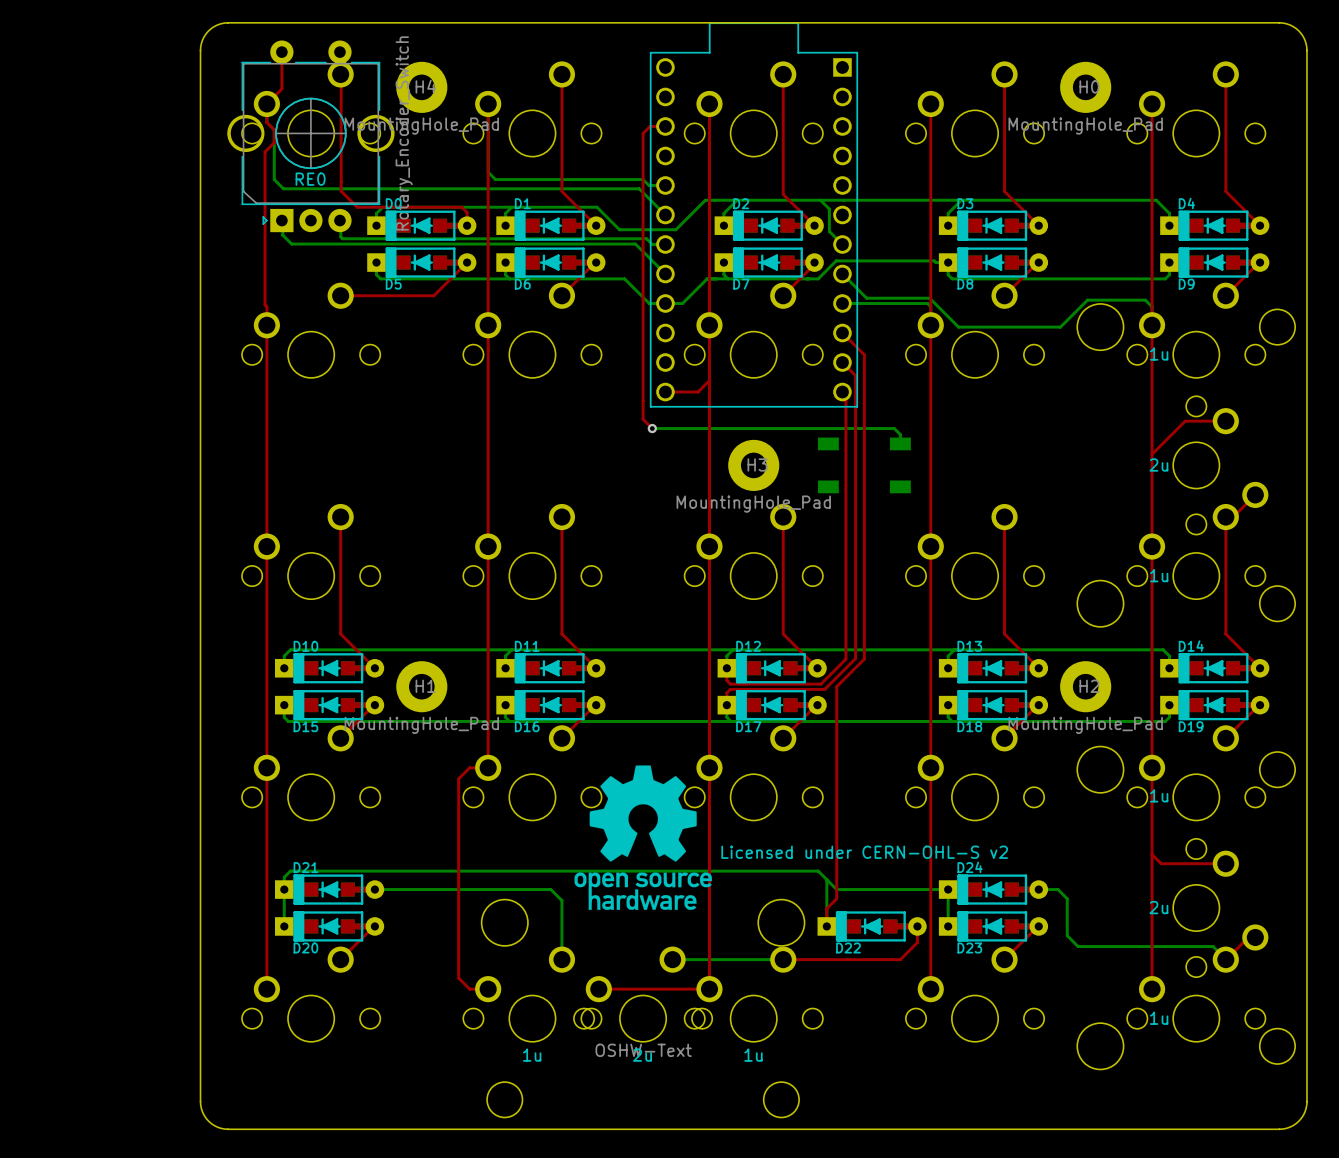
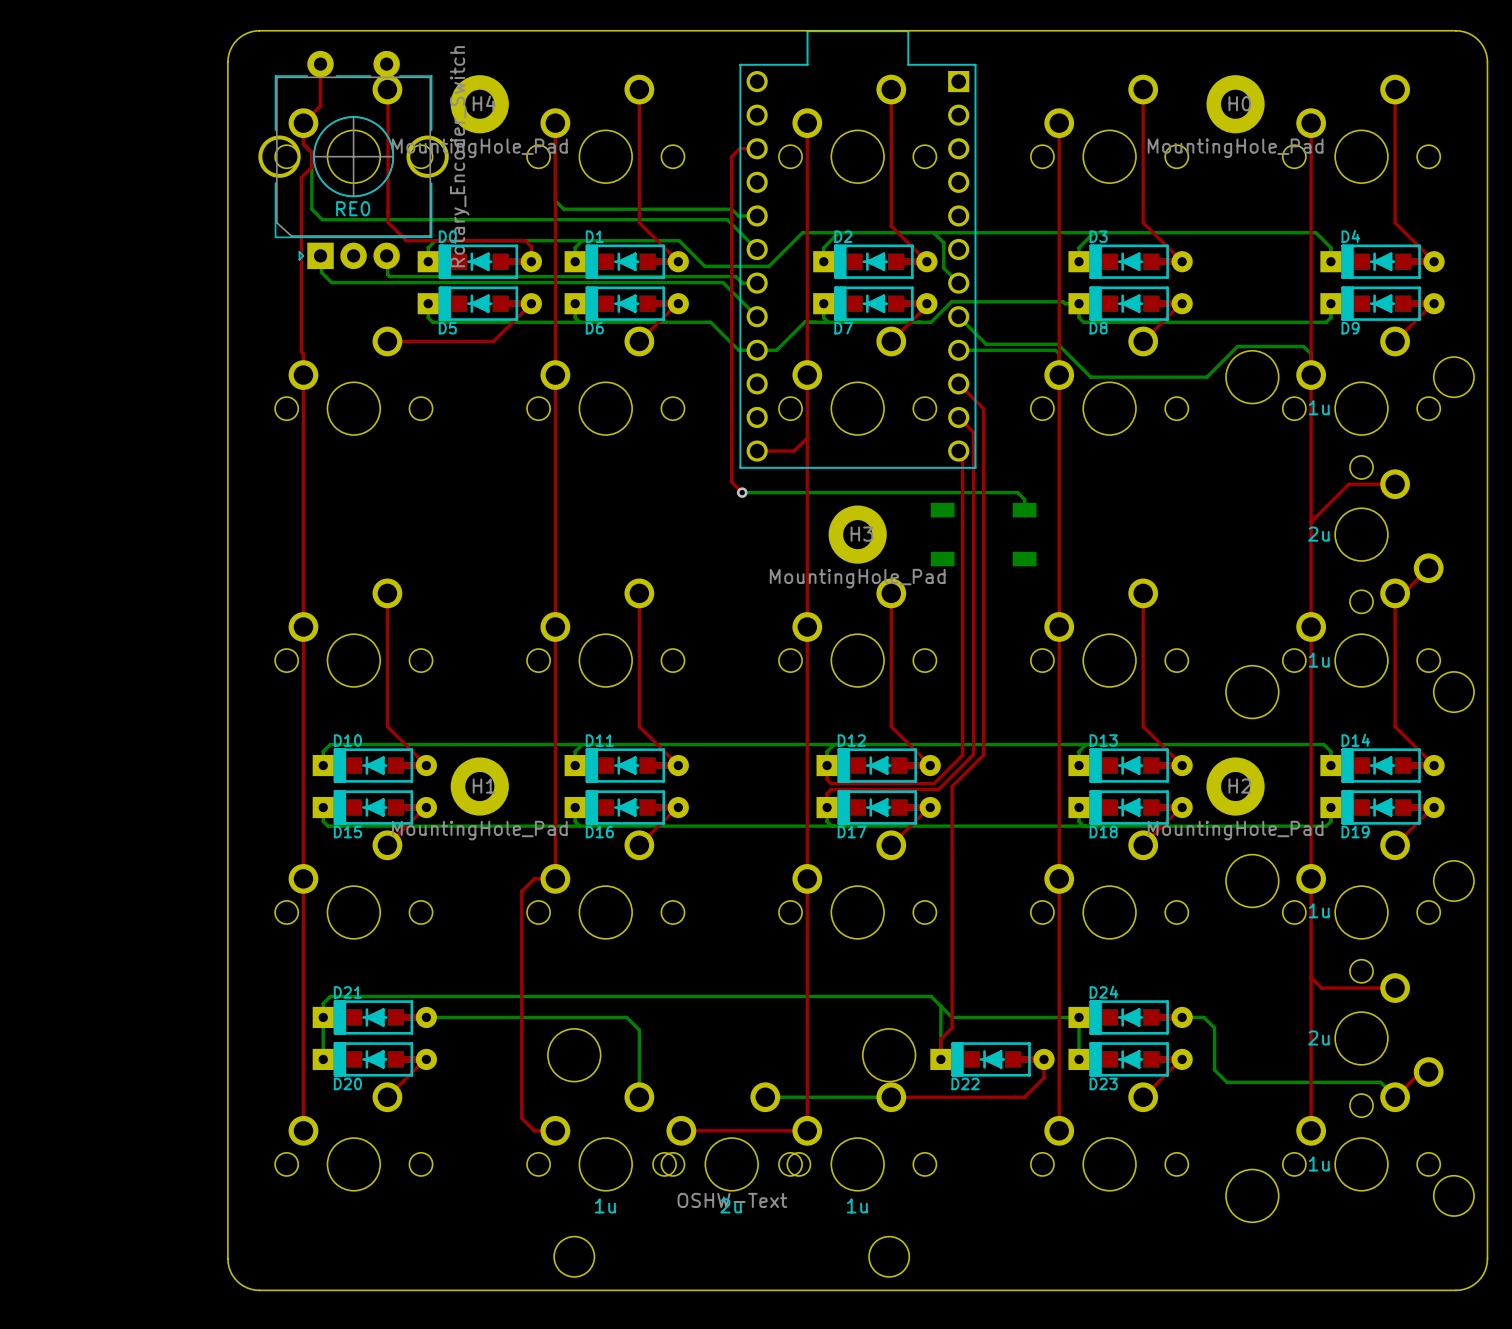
drawing: [574, 765, 713, 910] -> none

